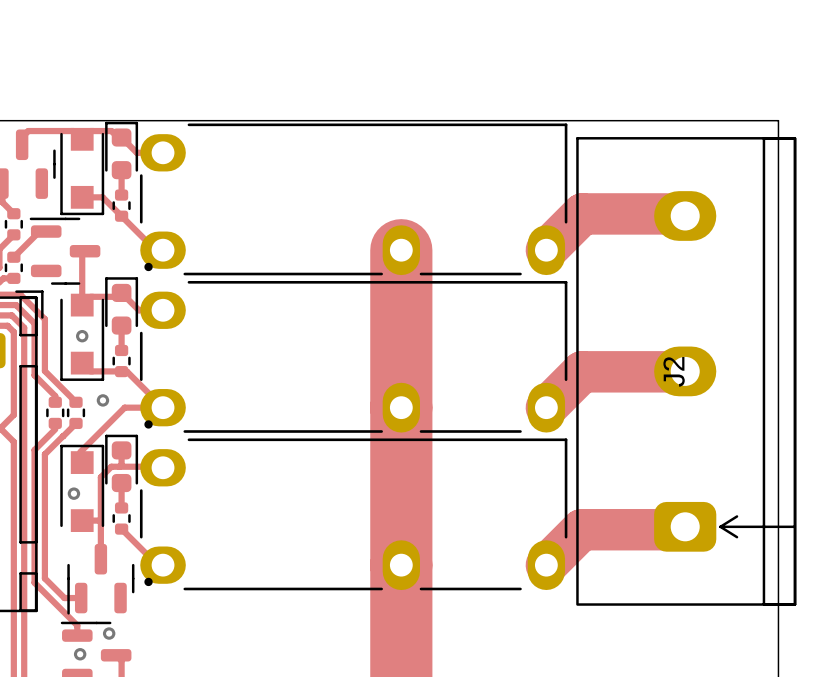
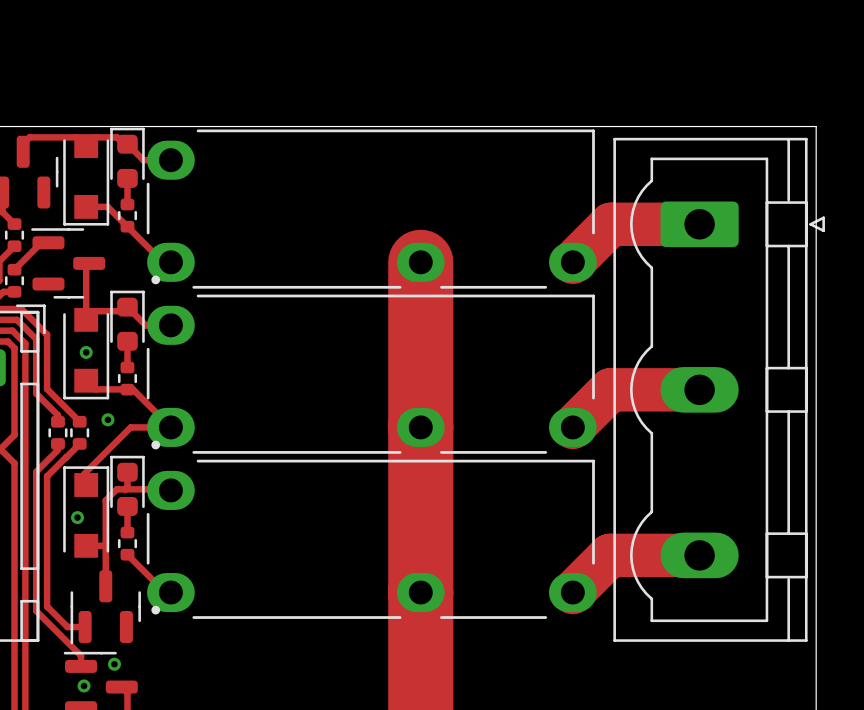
part footprint: [139, 123, 568, 276] -> [146, 129, 597, 289]
part footprint: [139, 280, 568, 433] -> [146, 294, 597, 454]
part: none -> (719, 389)
J2: (686, 371) -> none
part footprint: [139, 438, 568, 591] -> [146, 459, 597, 619]

